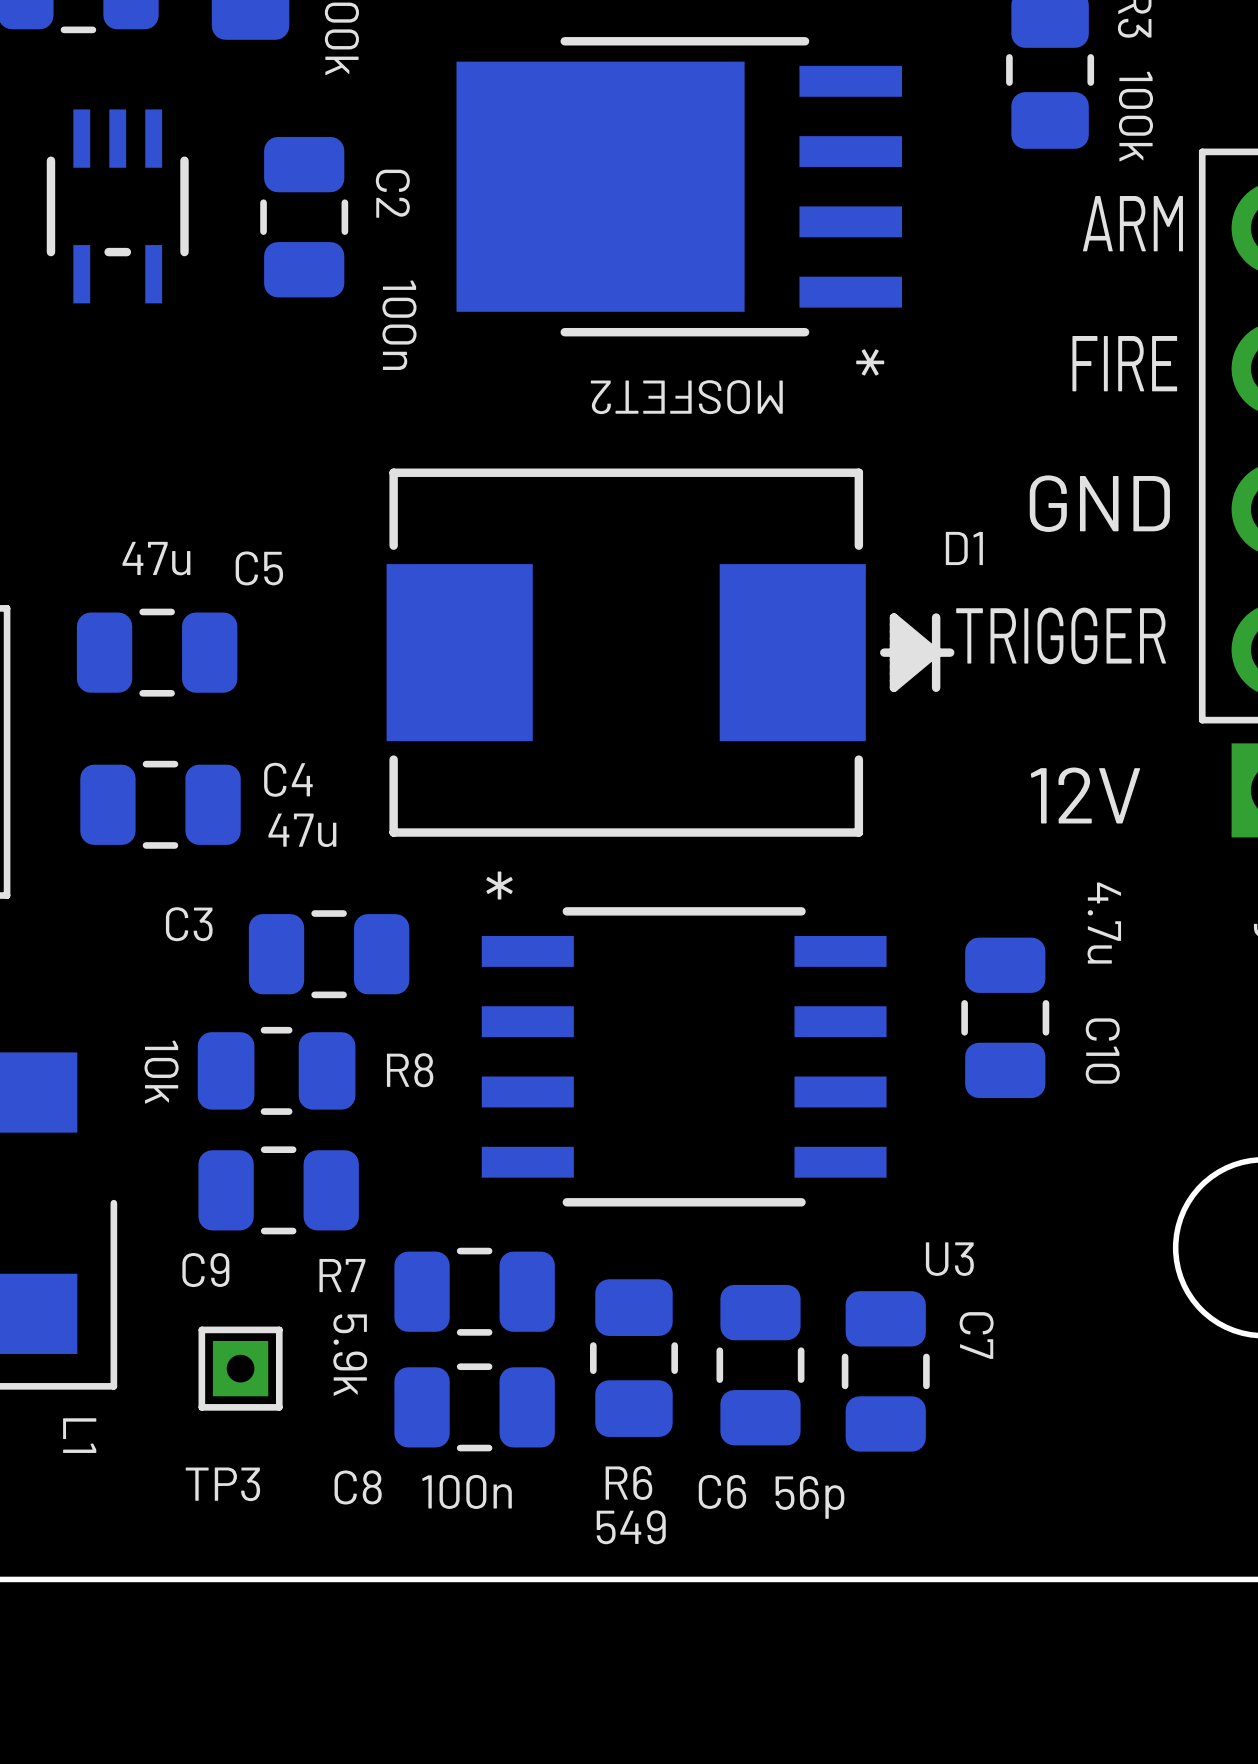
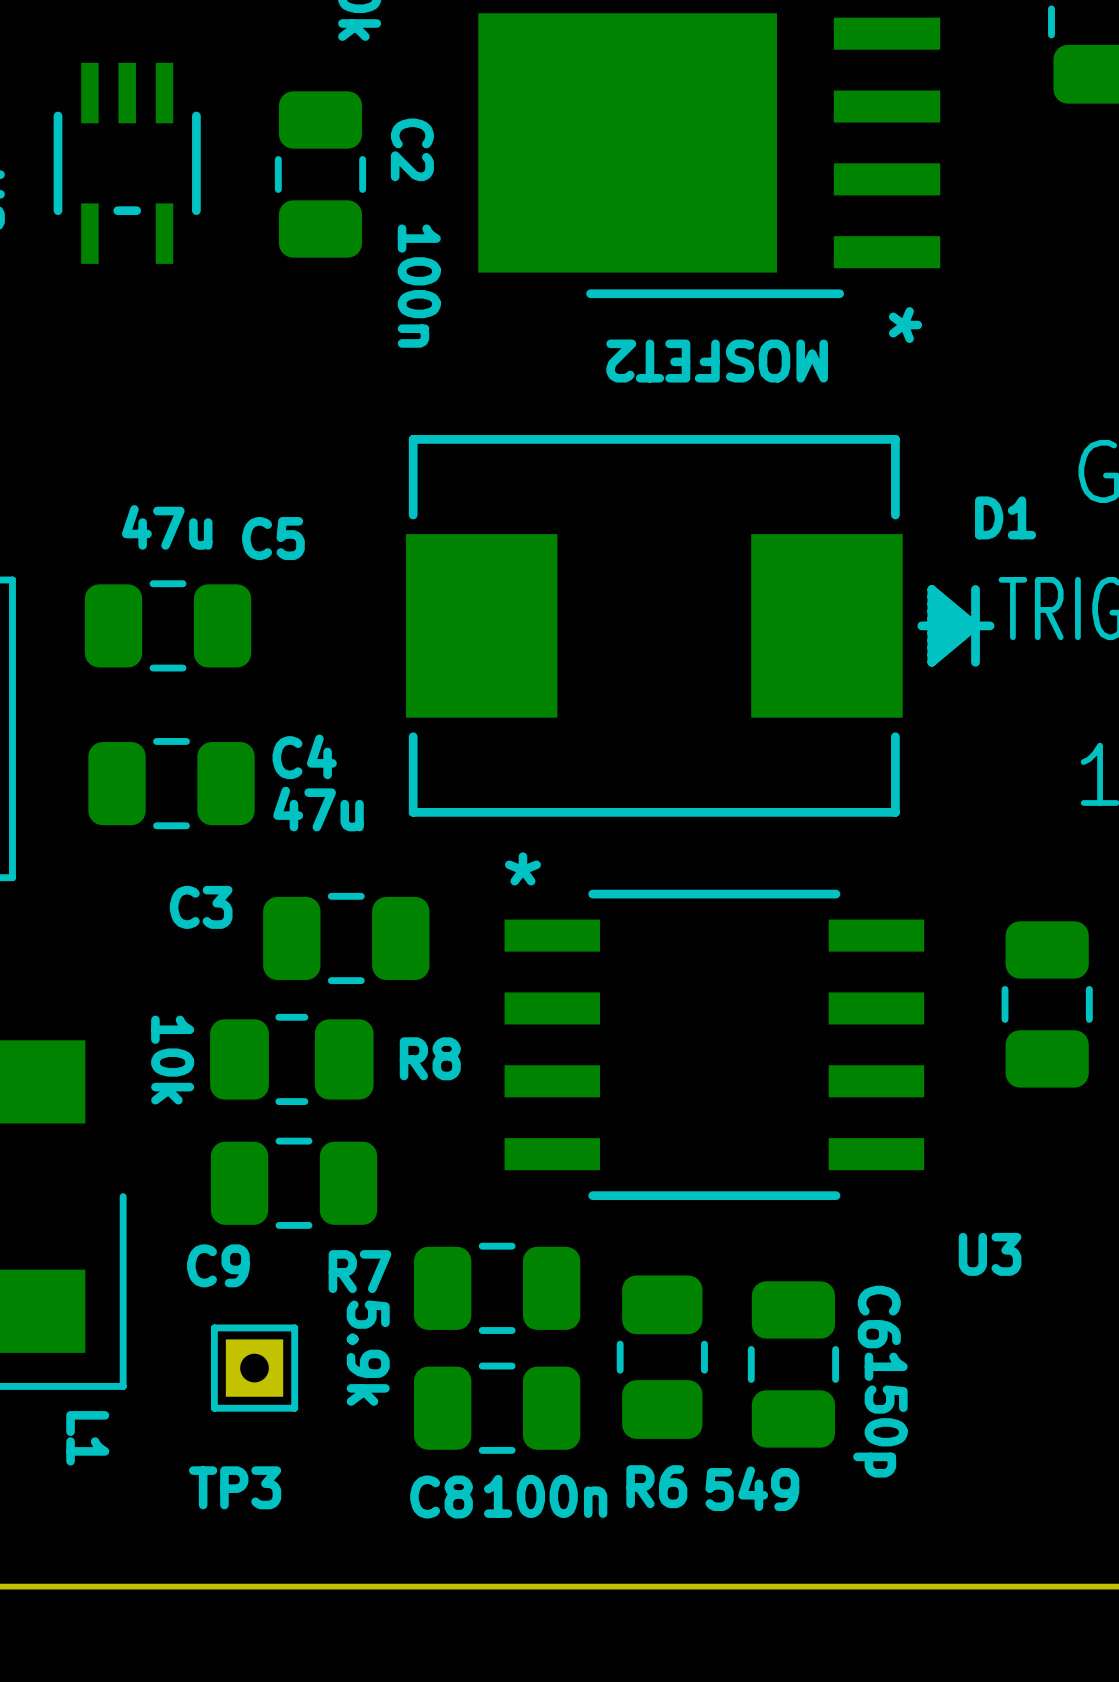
C7: (885, 1371) -> none
C8 name position: C8 (358, 1487) -> C8 (441, 1496)
C8 value position: 100n (467, 1491) -> 100n (545, 1496)
C6 name rotation: 0° (722, 1491) -> 90° clockwise (879, 1317)
C6 name position: C6 (722, 1491) -> C6 (879, 1317)
C6 value: 56p (809, 1497) -> 150p (880, 1415)
R6 value position: 549 (631, 1527) -> 549 (752, 1488)

